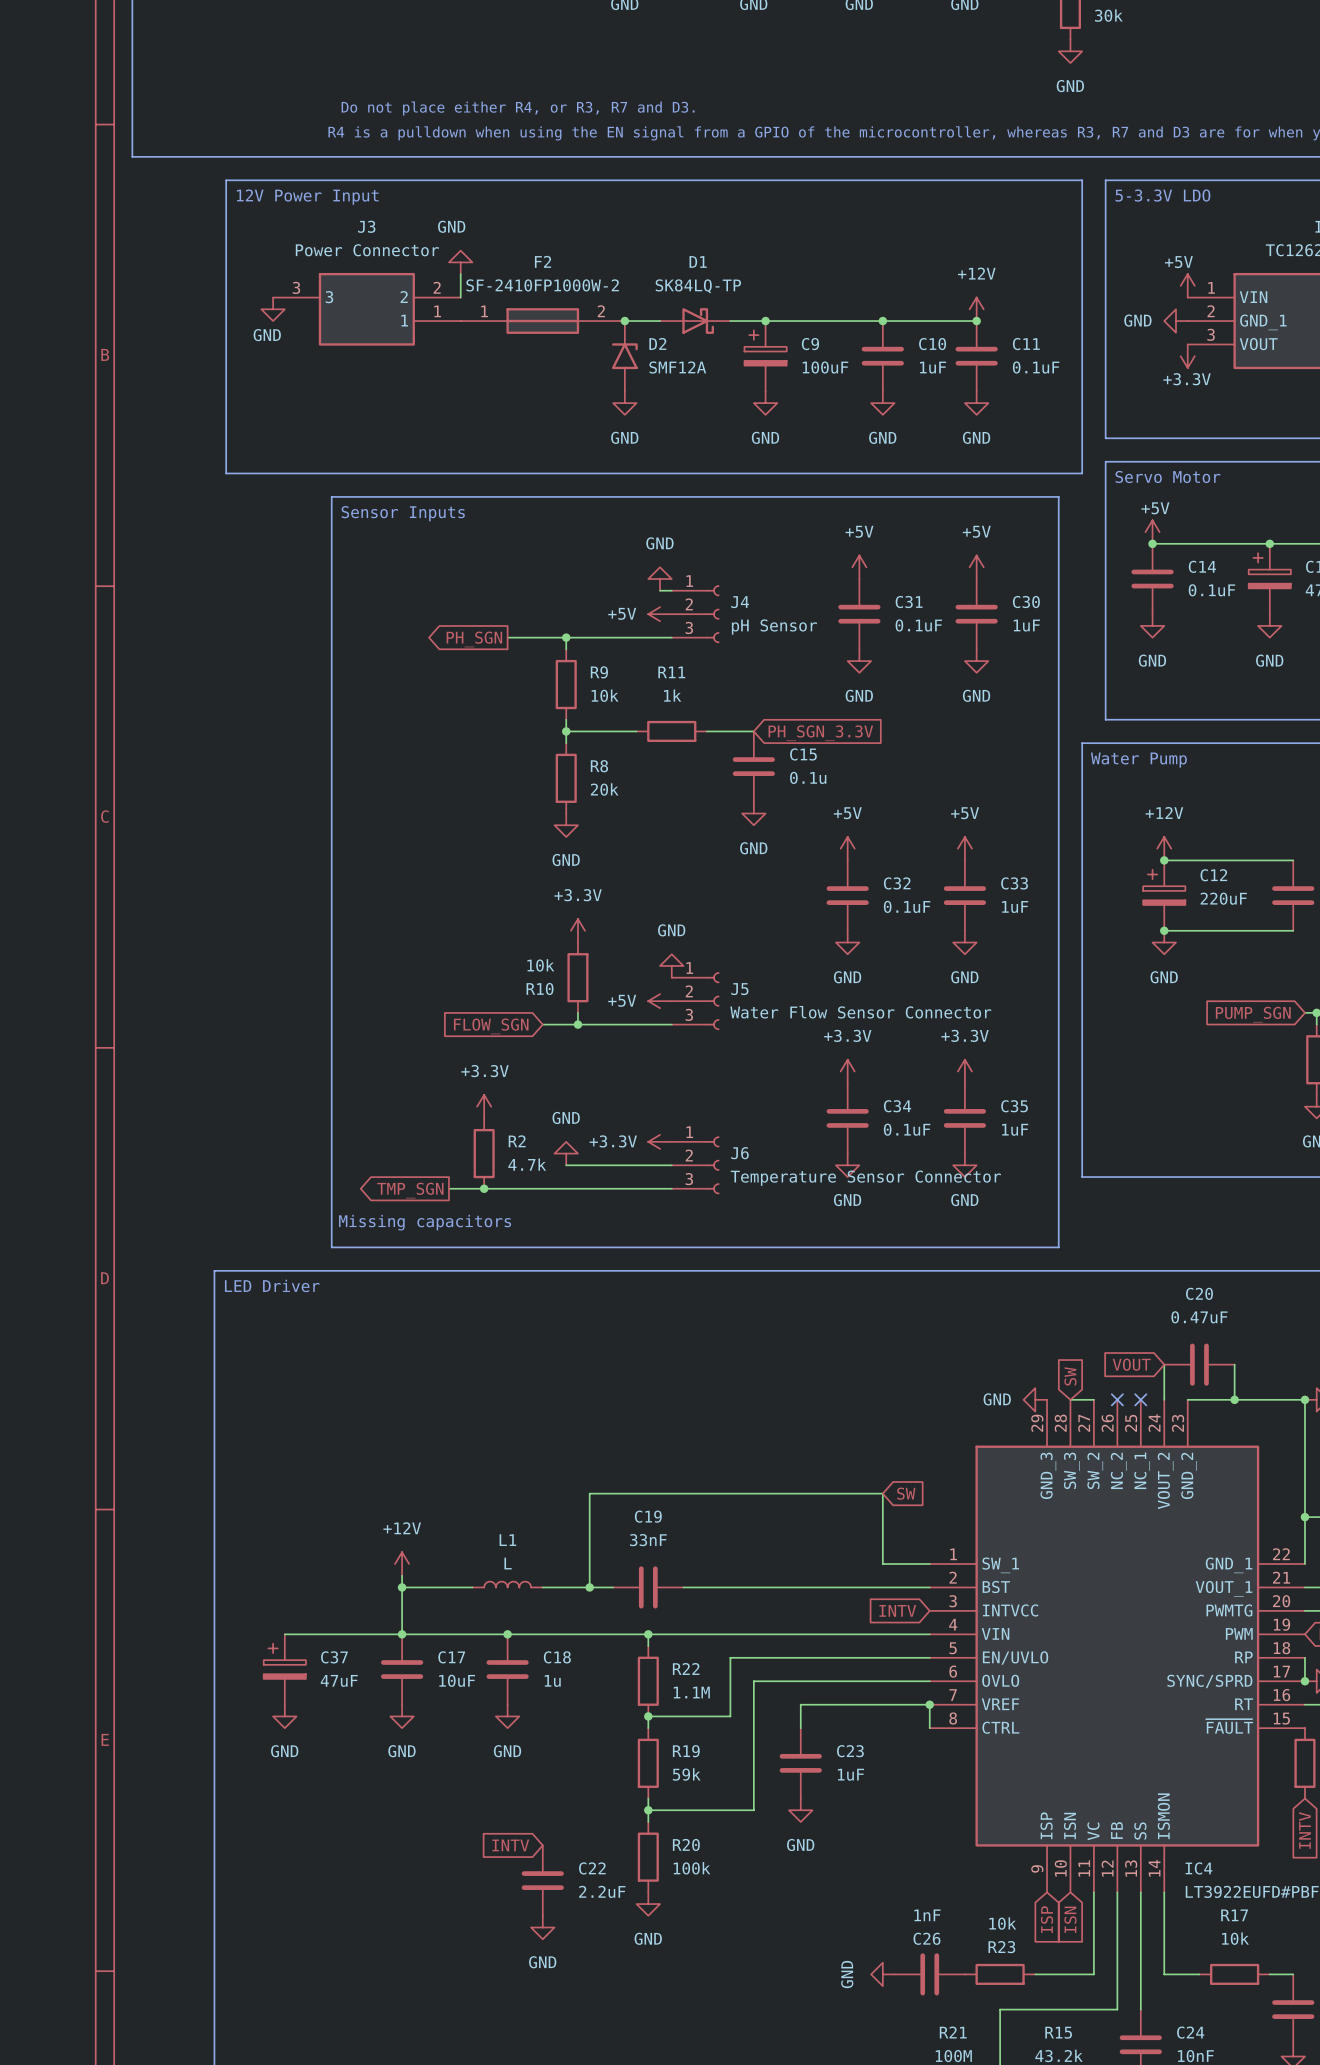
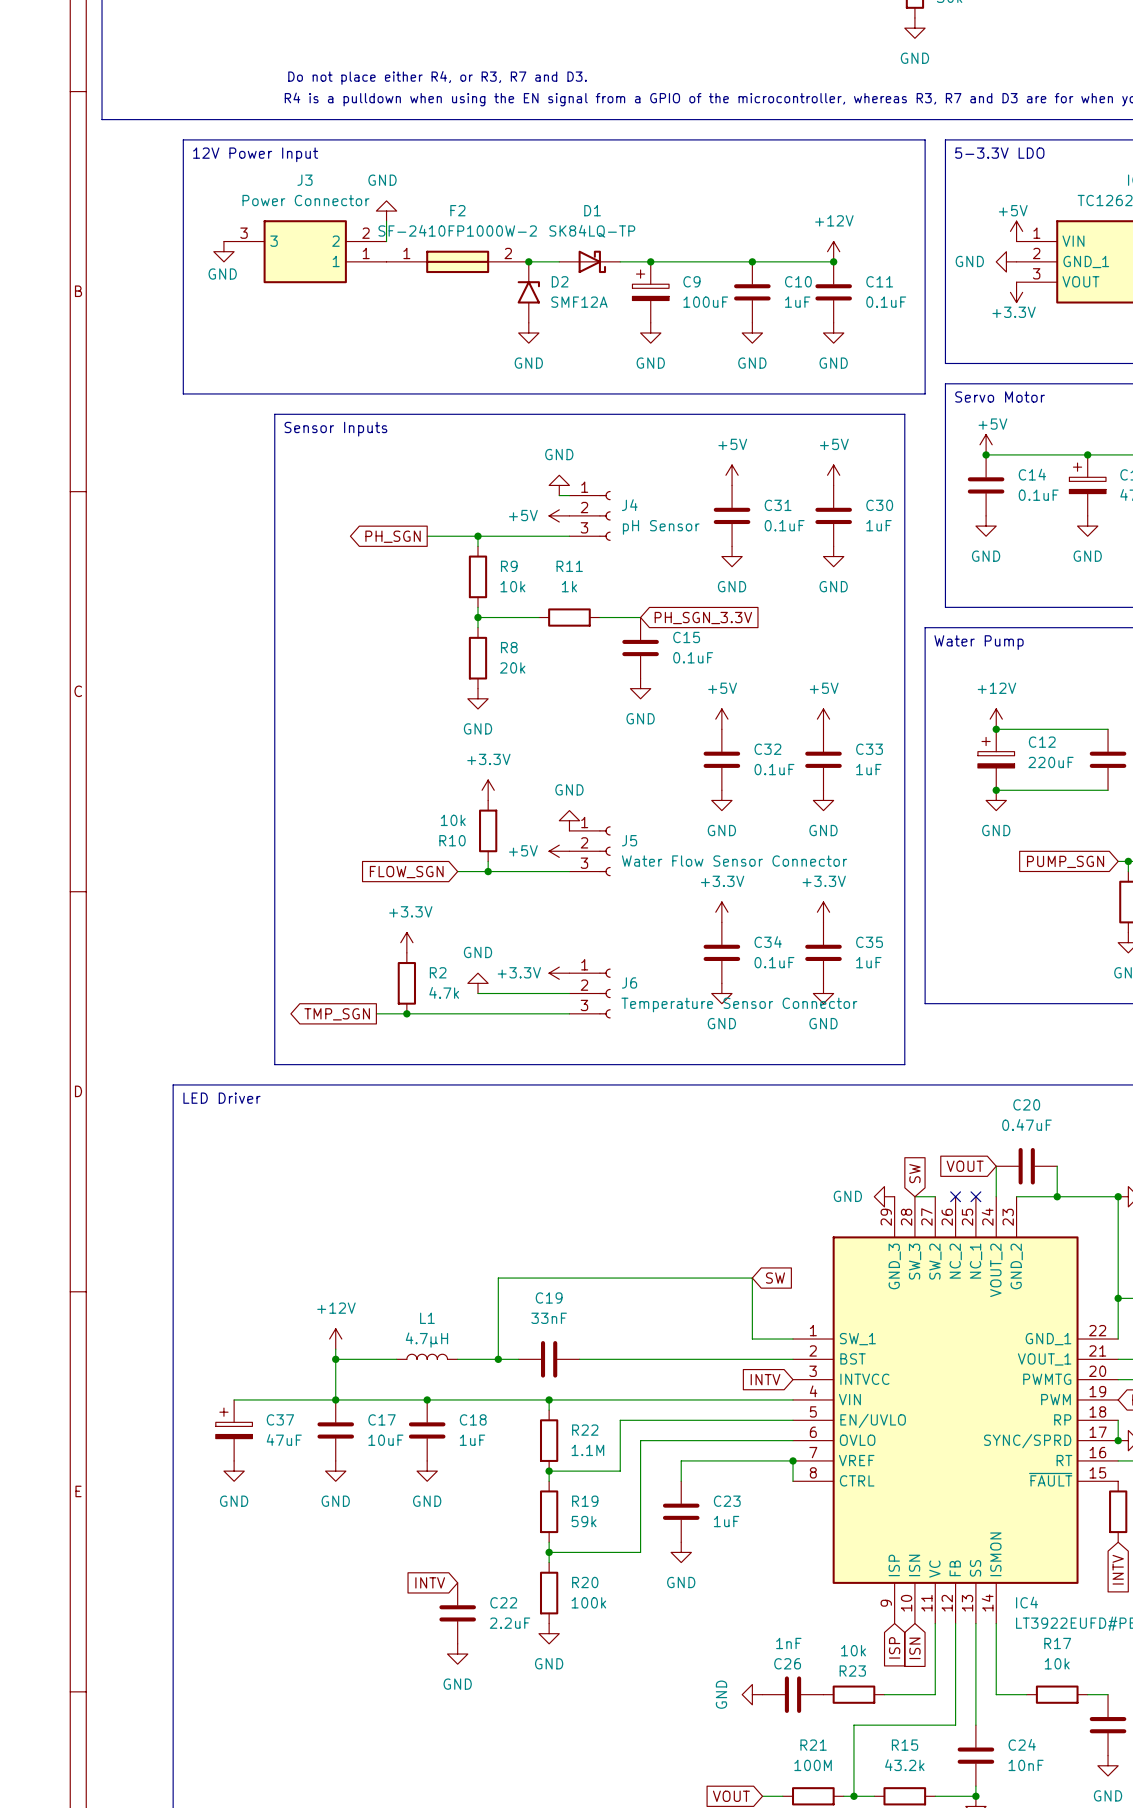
C15 value: 0.1u (808, 777) -> 0.1uF (693, 657)
text: Missing capacitors (425, 1222) -> none
L1 value: L (508, 1563) -> 4.7µH (426, 1340)
C18 value: 1u (552, 1680) -> 1uF (472, 1440)

